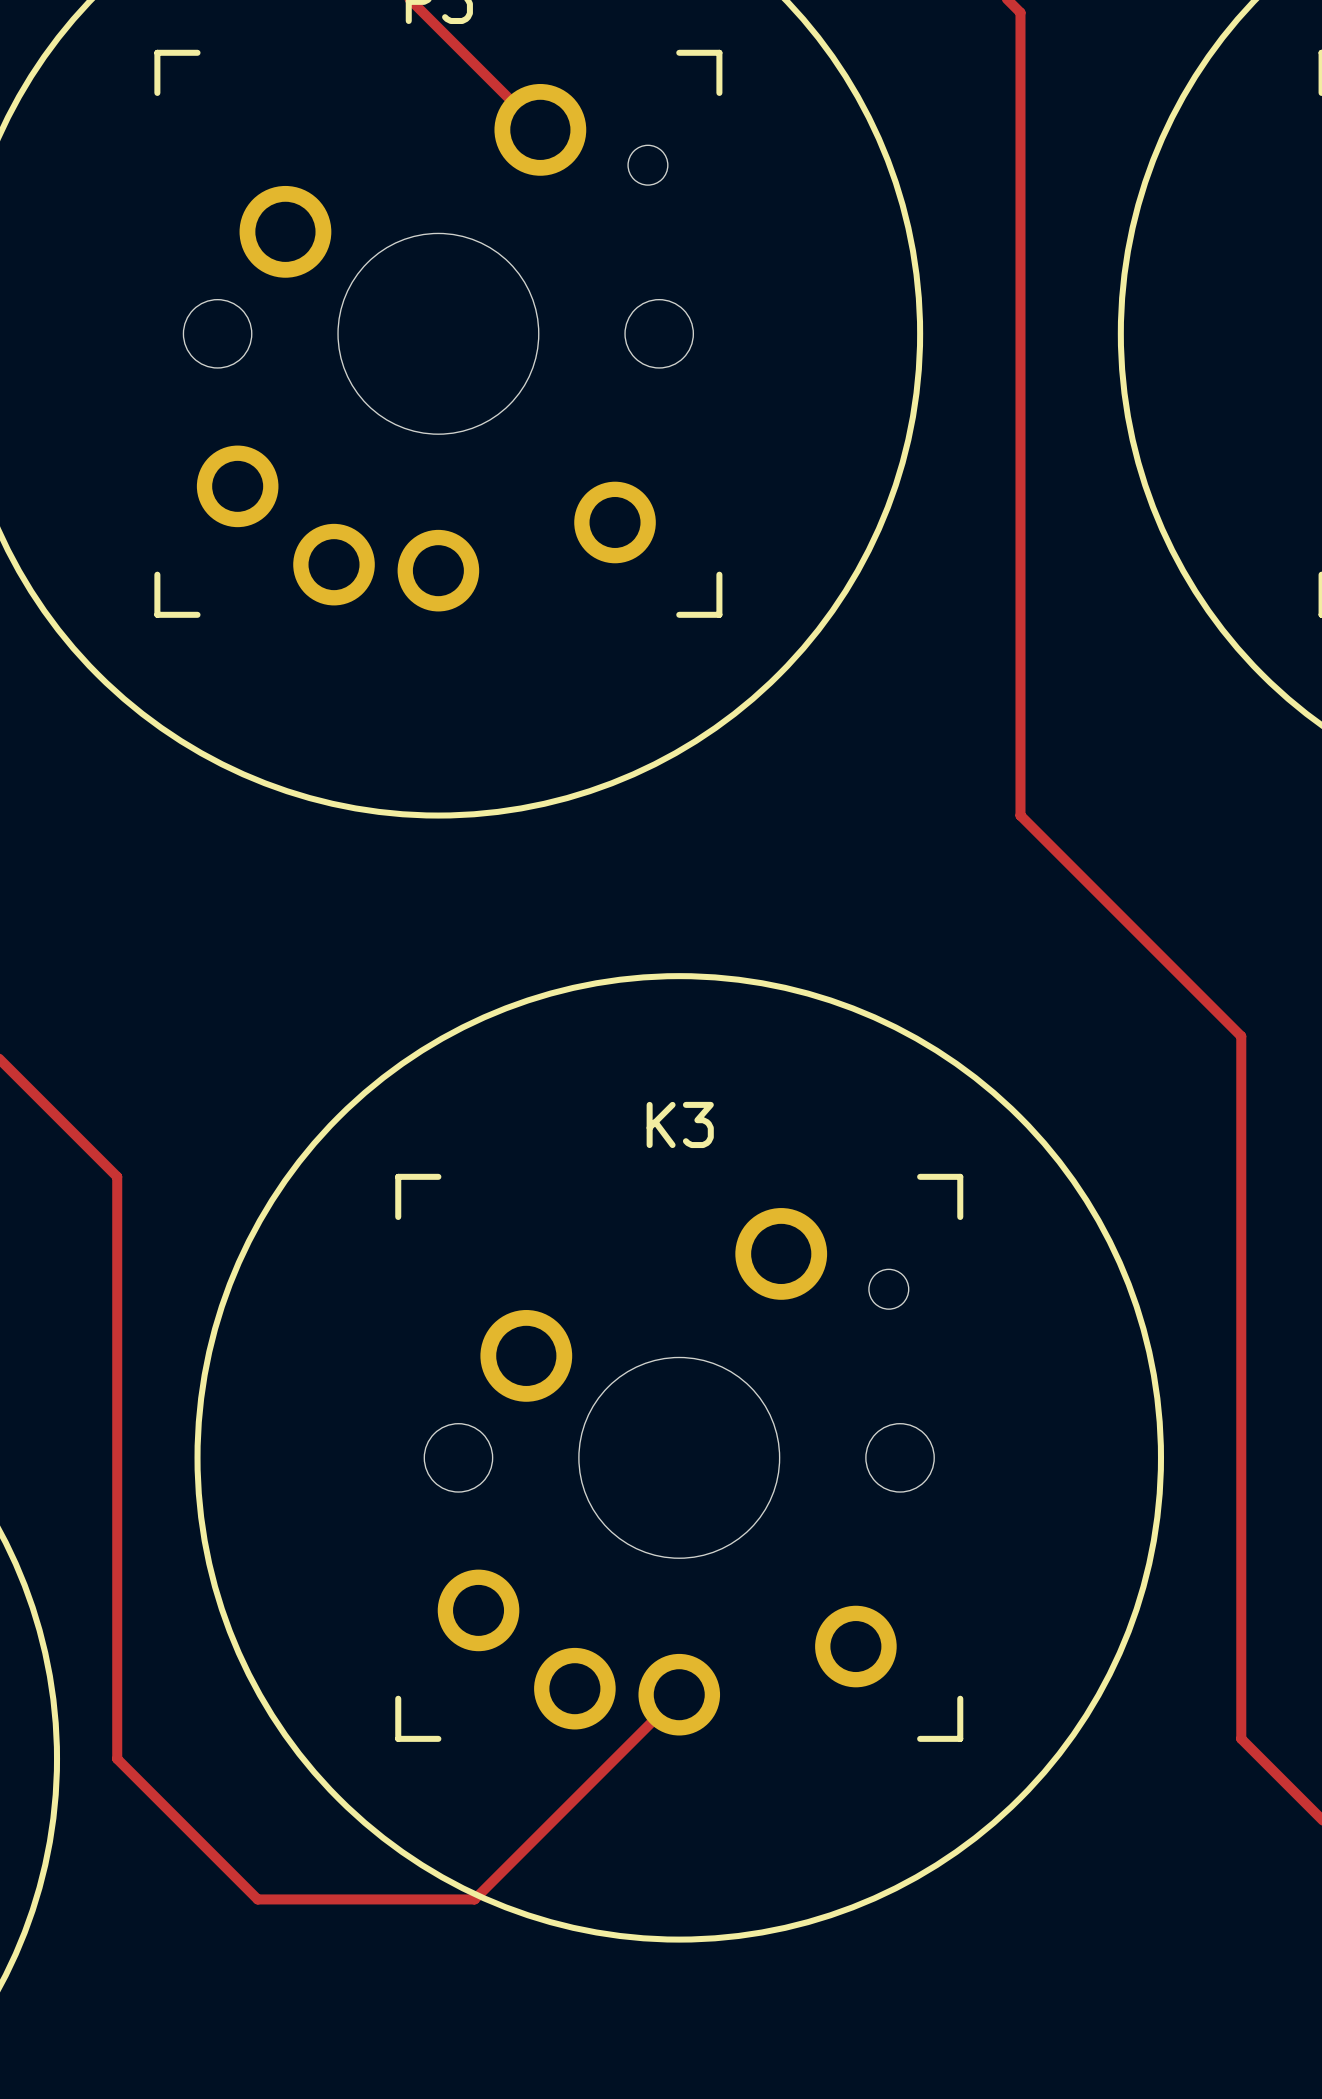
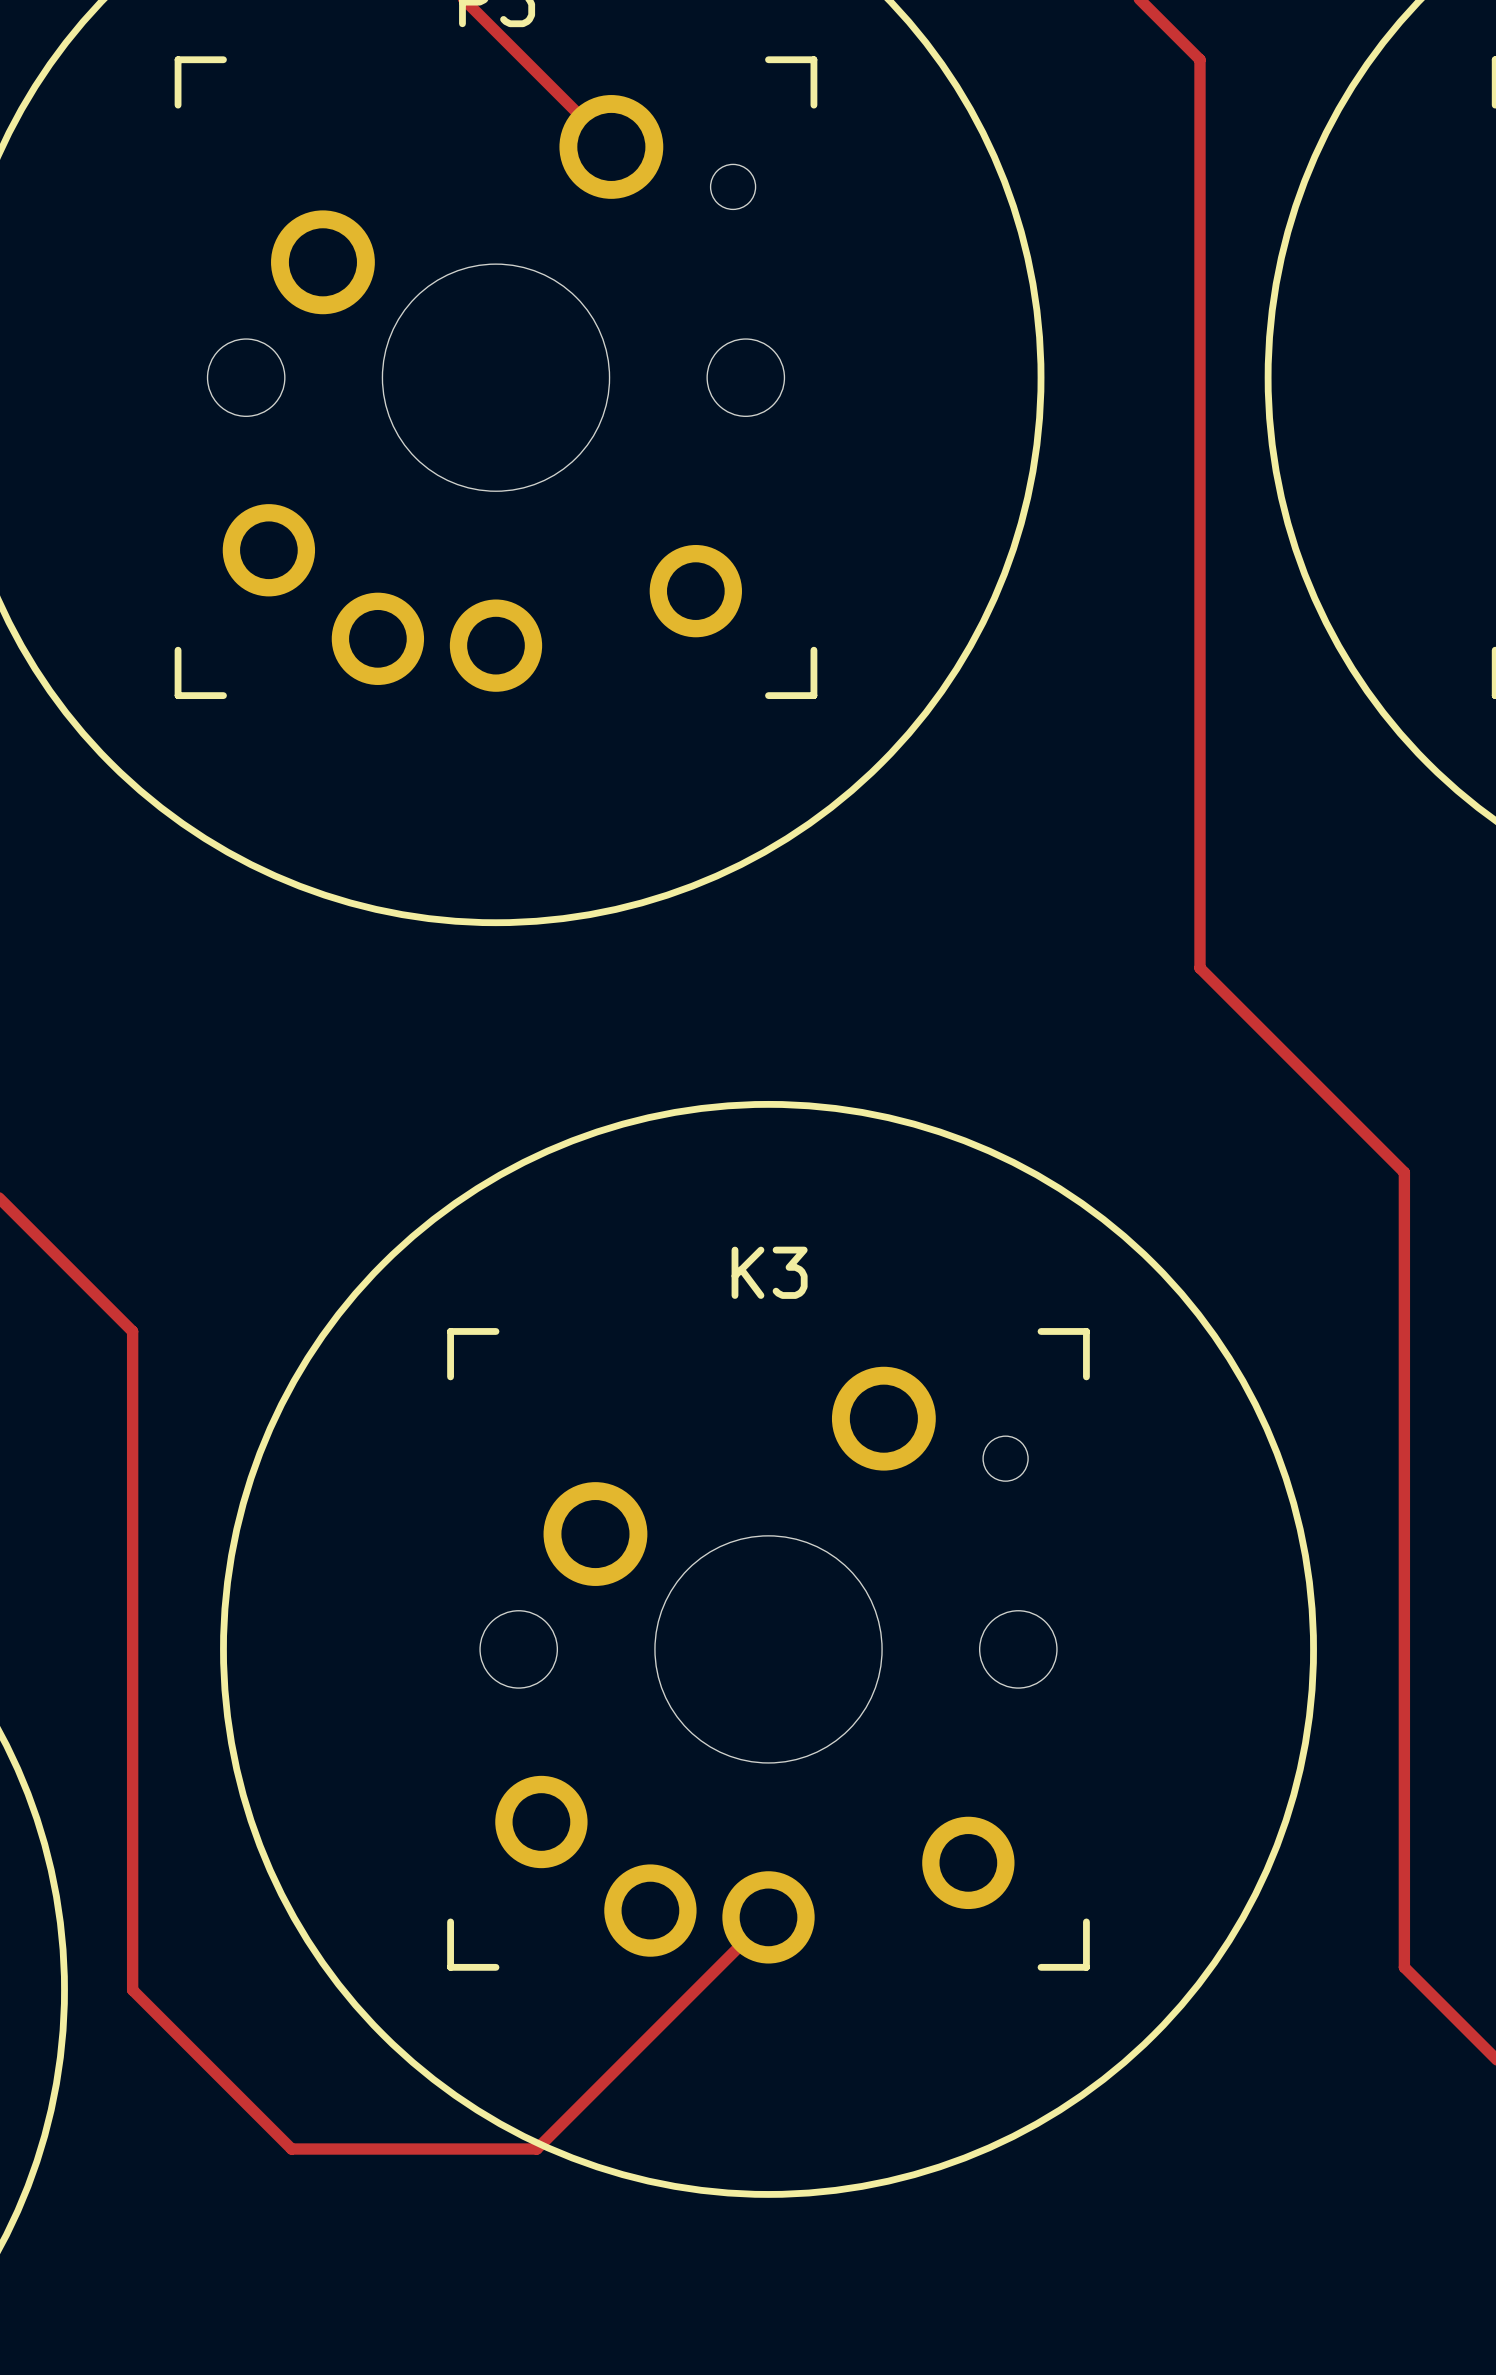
track: (1020, 12) (1020, 815) (1060, 855) -> (1154, 14) (1199, 59) (1199, 968)

